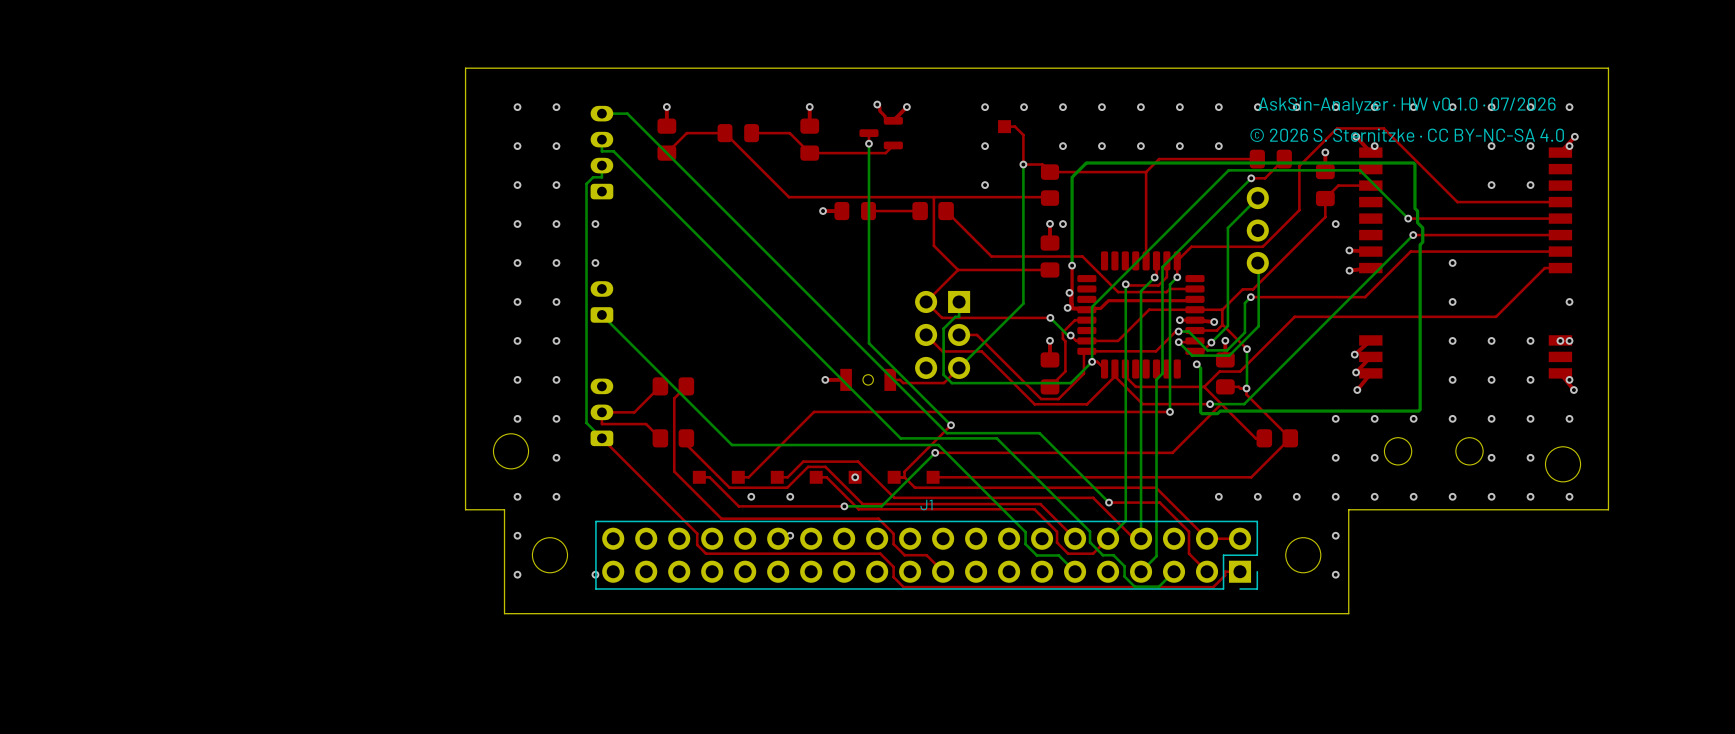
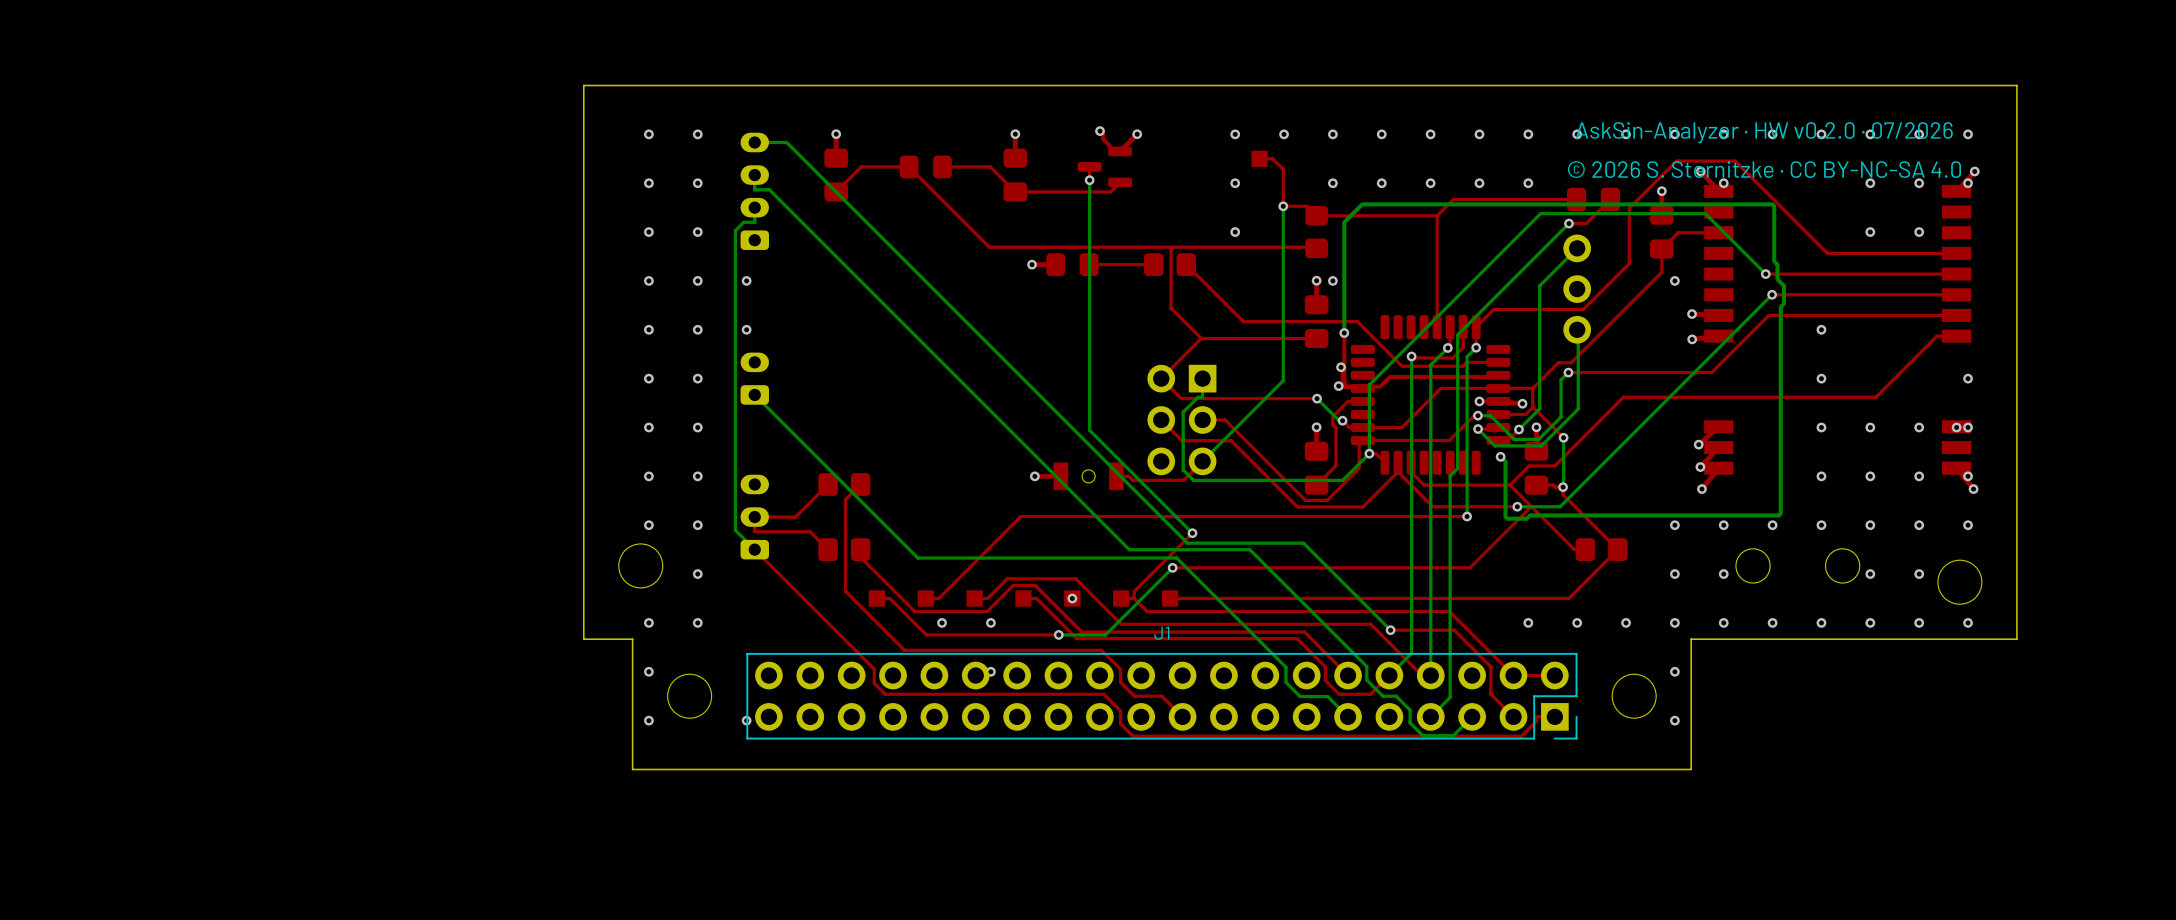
text: AskSin-Analyzer · HW v0.1.0 · 07/2026 (1407, 105) -> AskSin-Analyzer · HW v0.2.0 · 07/2026 (1764, 132)

